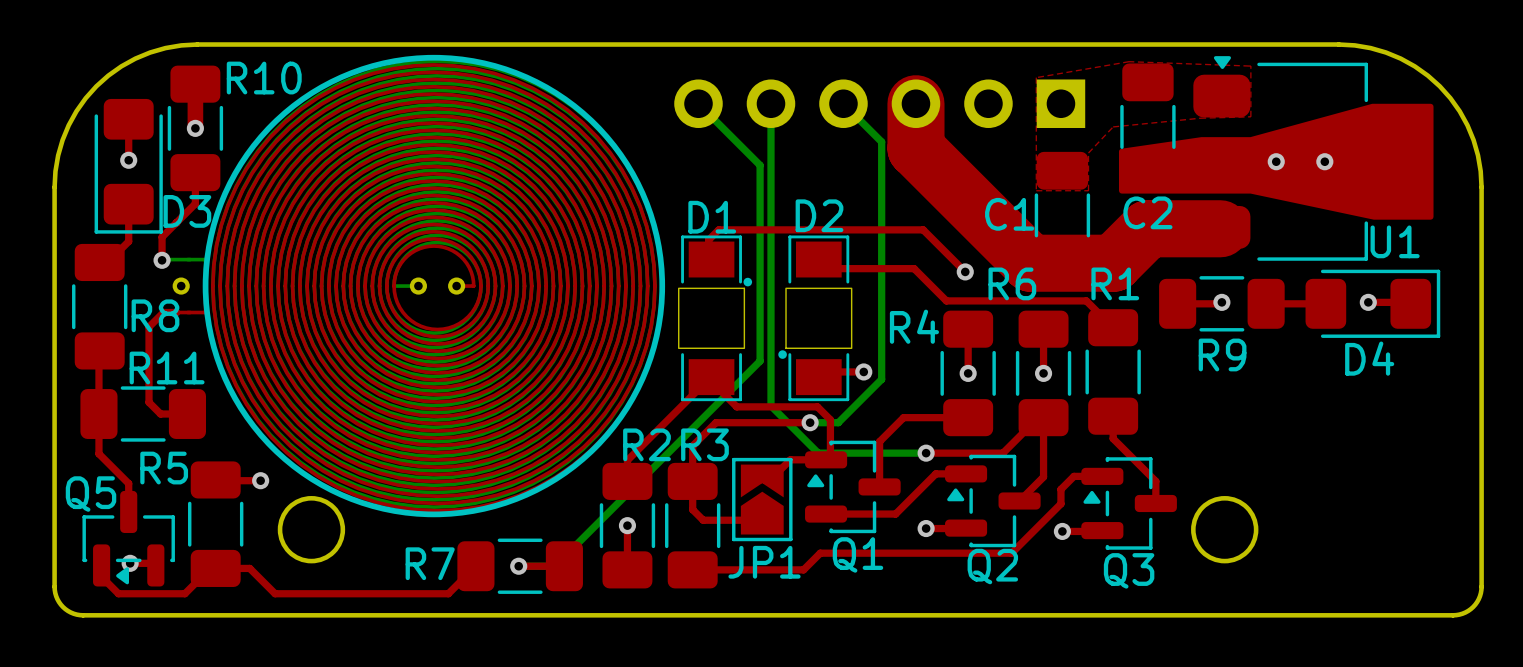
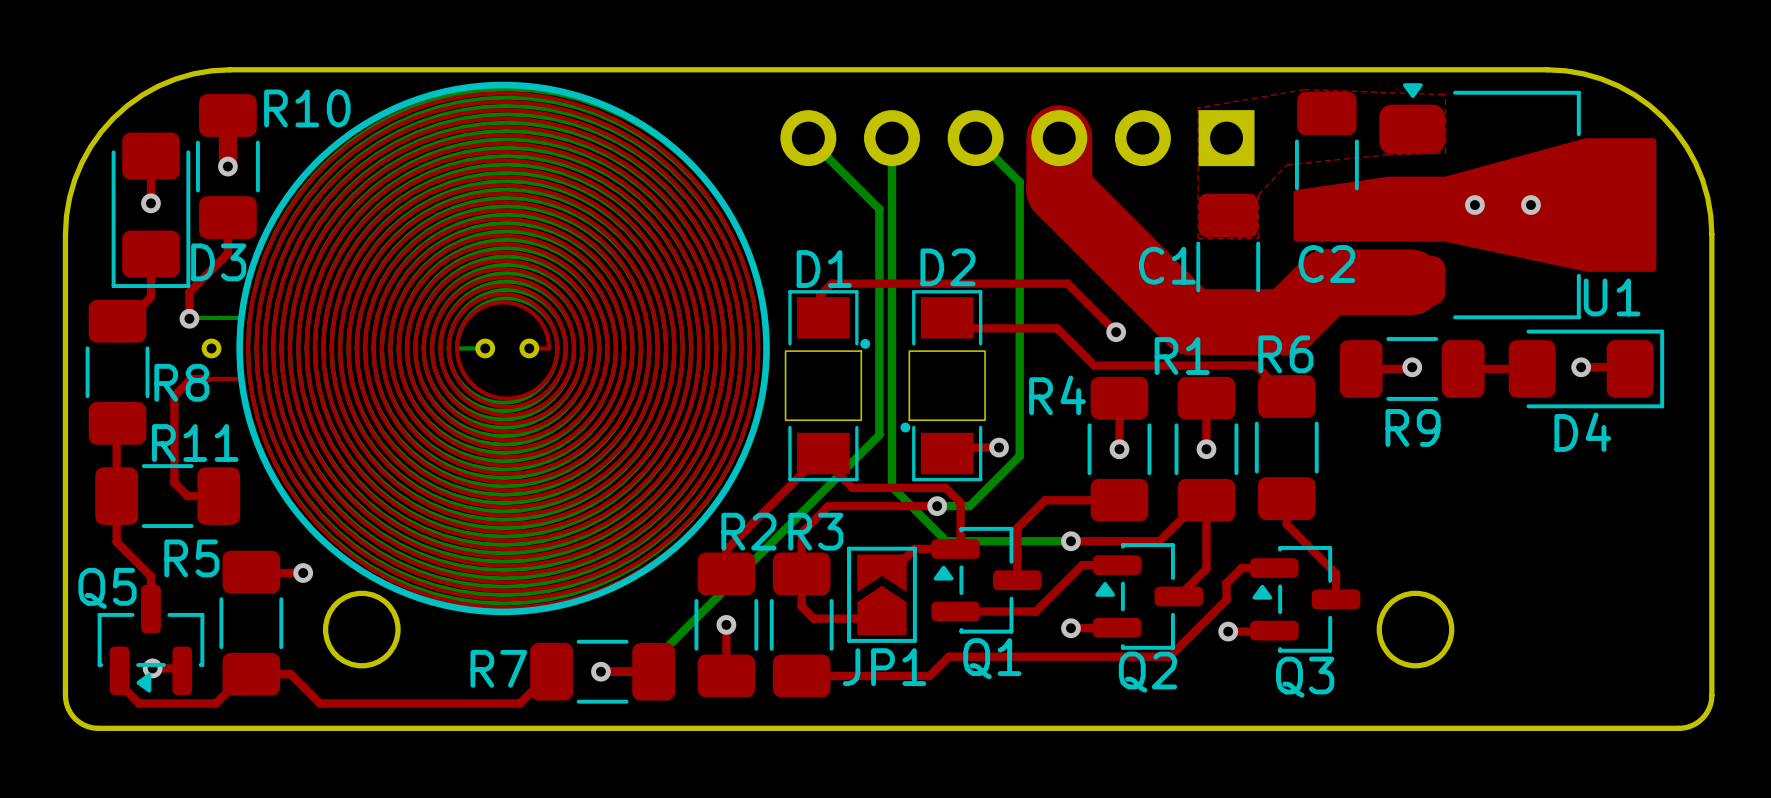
R6 name position: R6 (1012, 283) -> R6 (1285, 354)
R1 name position: R1 (1115, 283) -> R1 (1182, 356)

